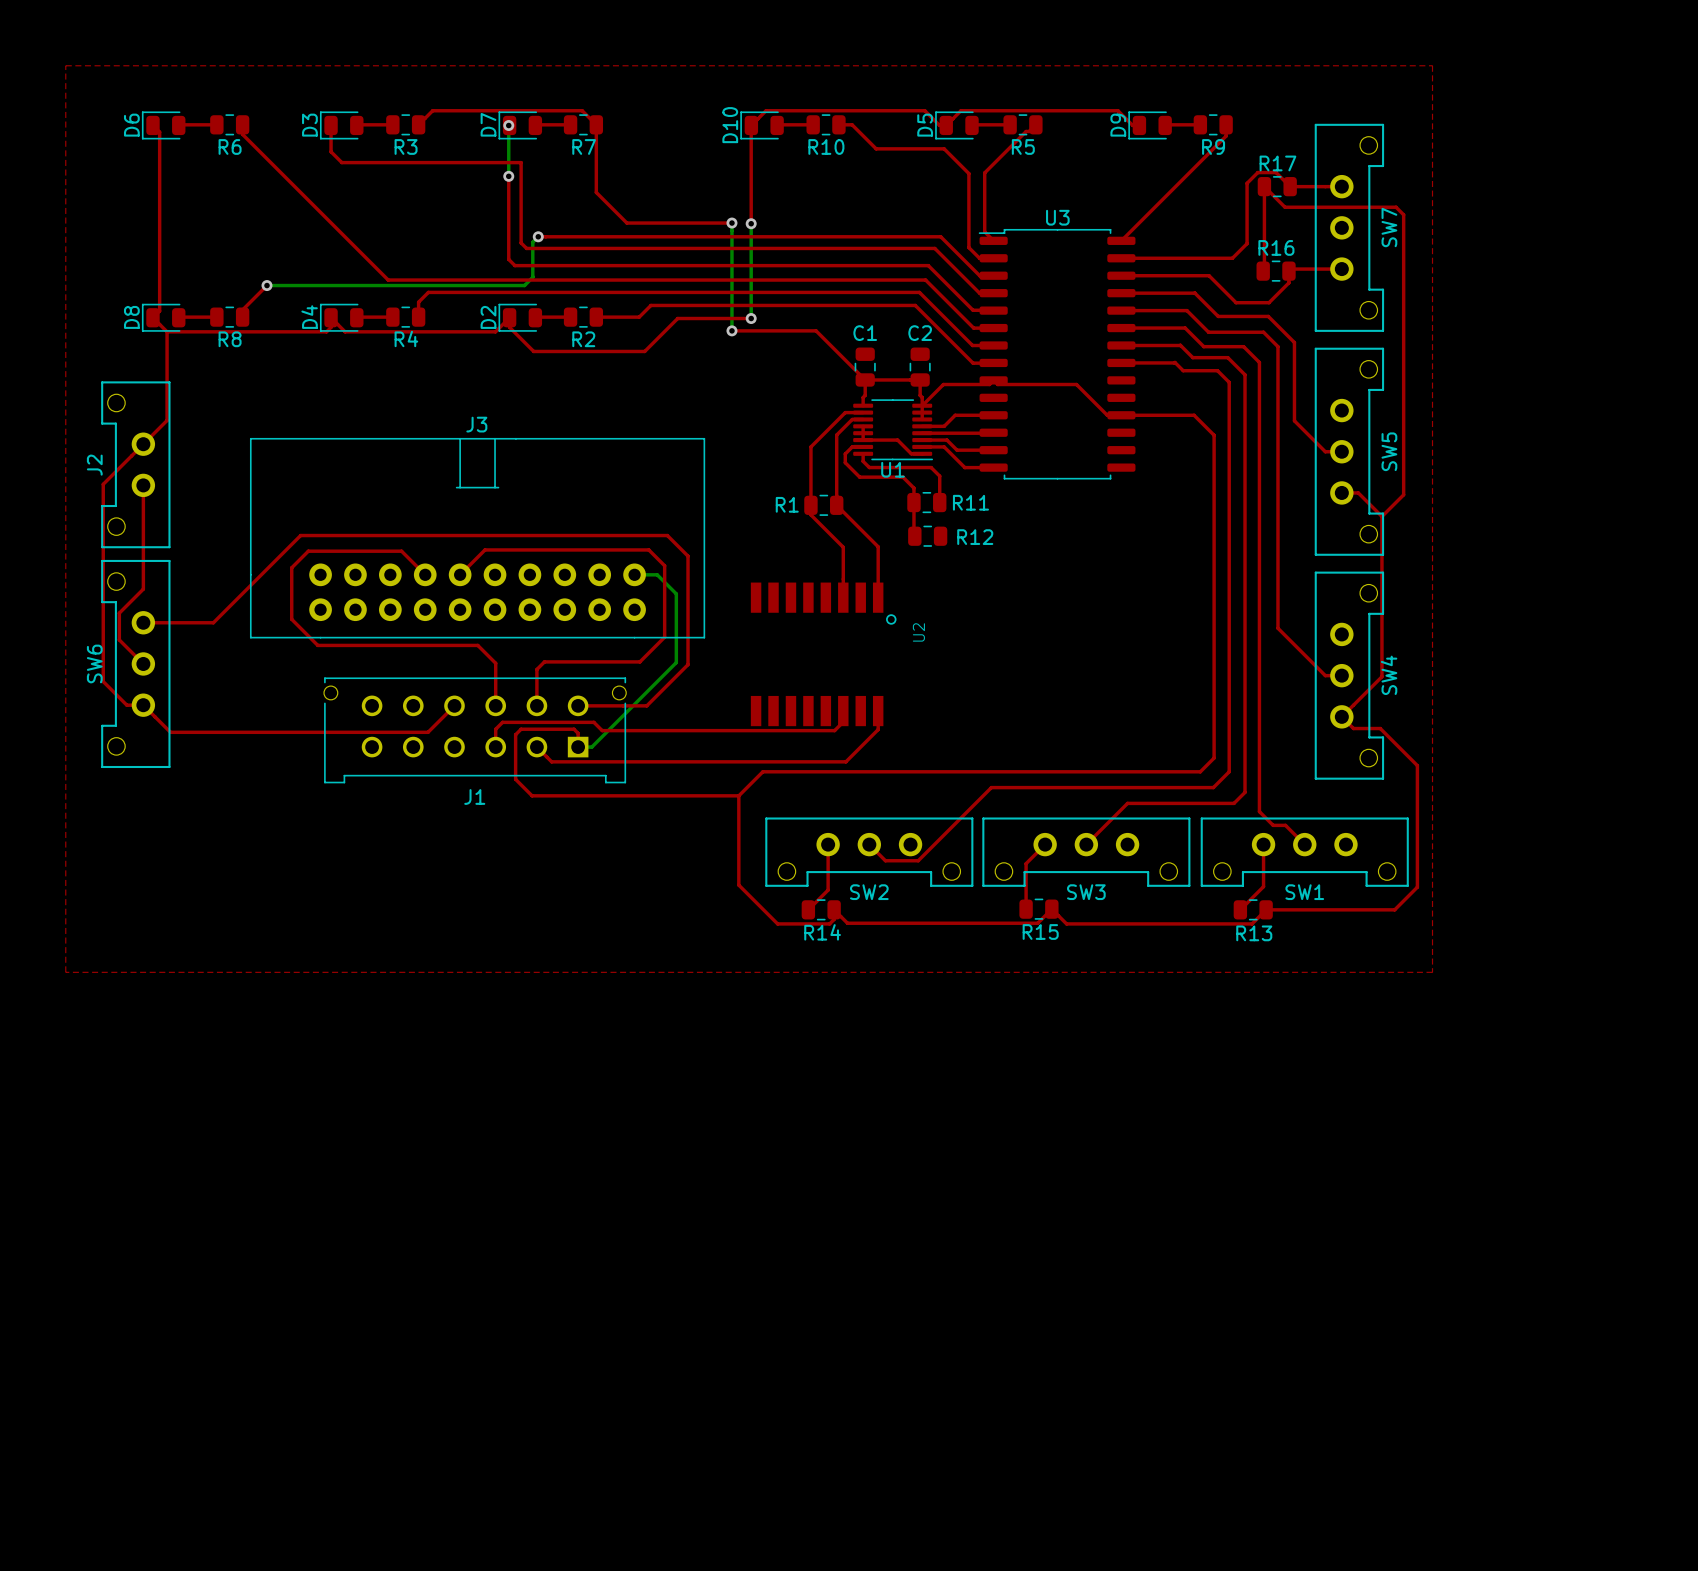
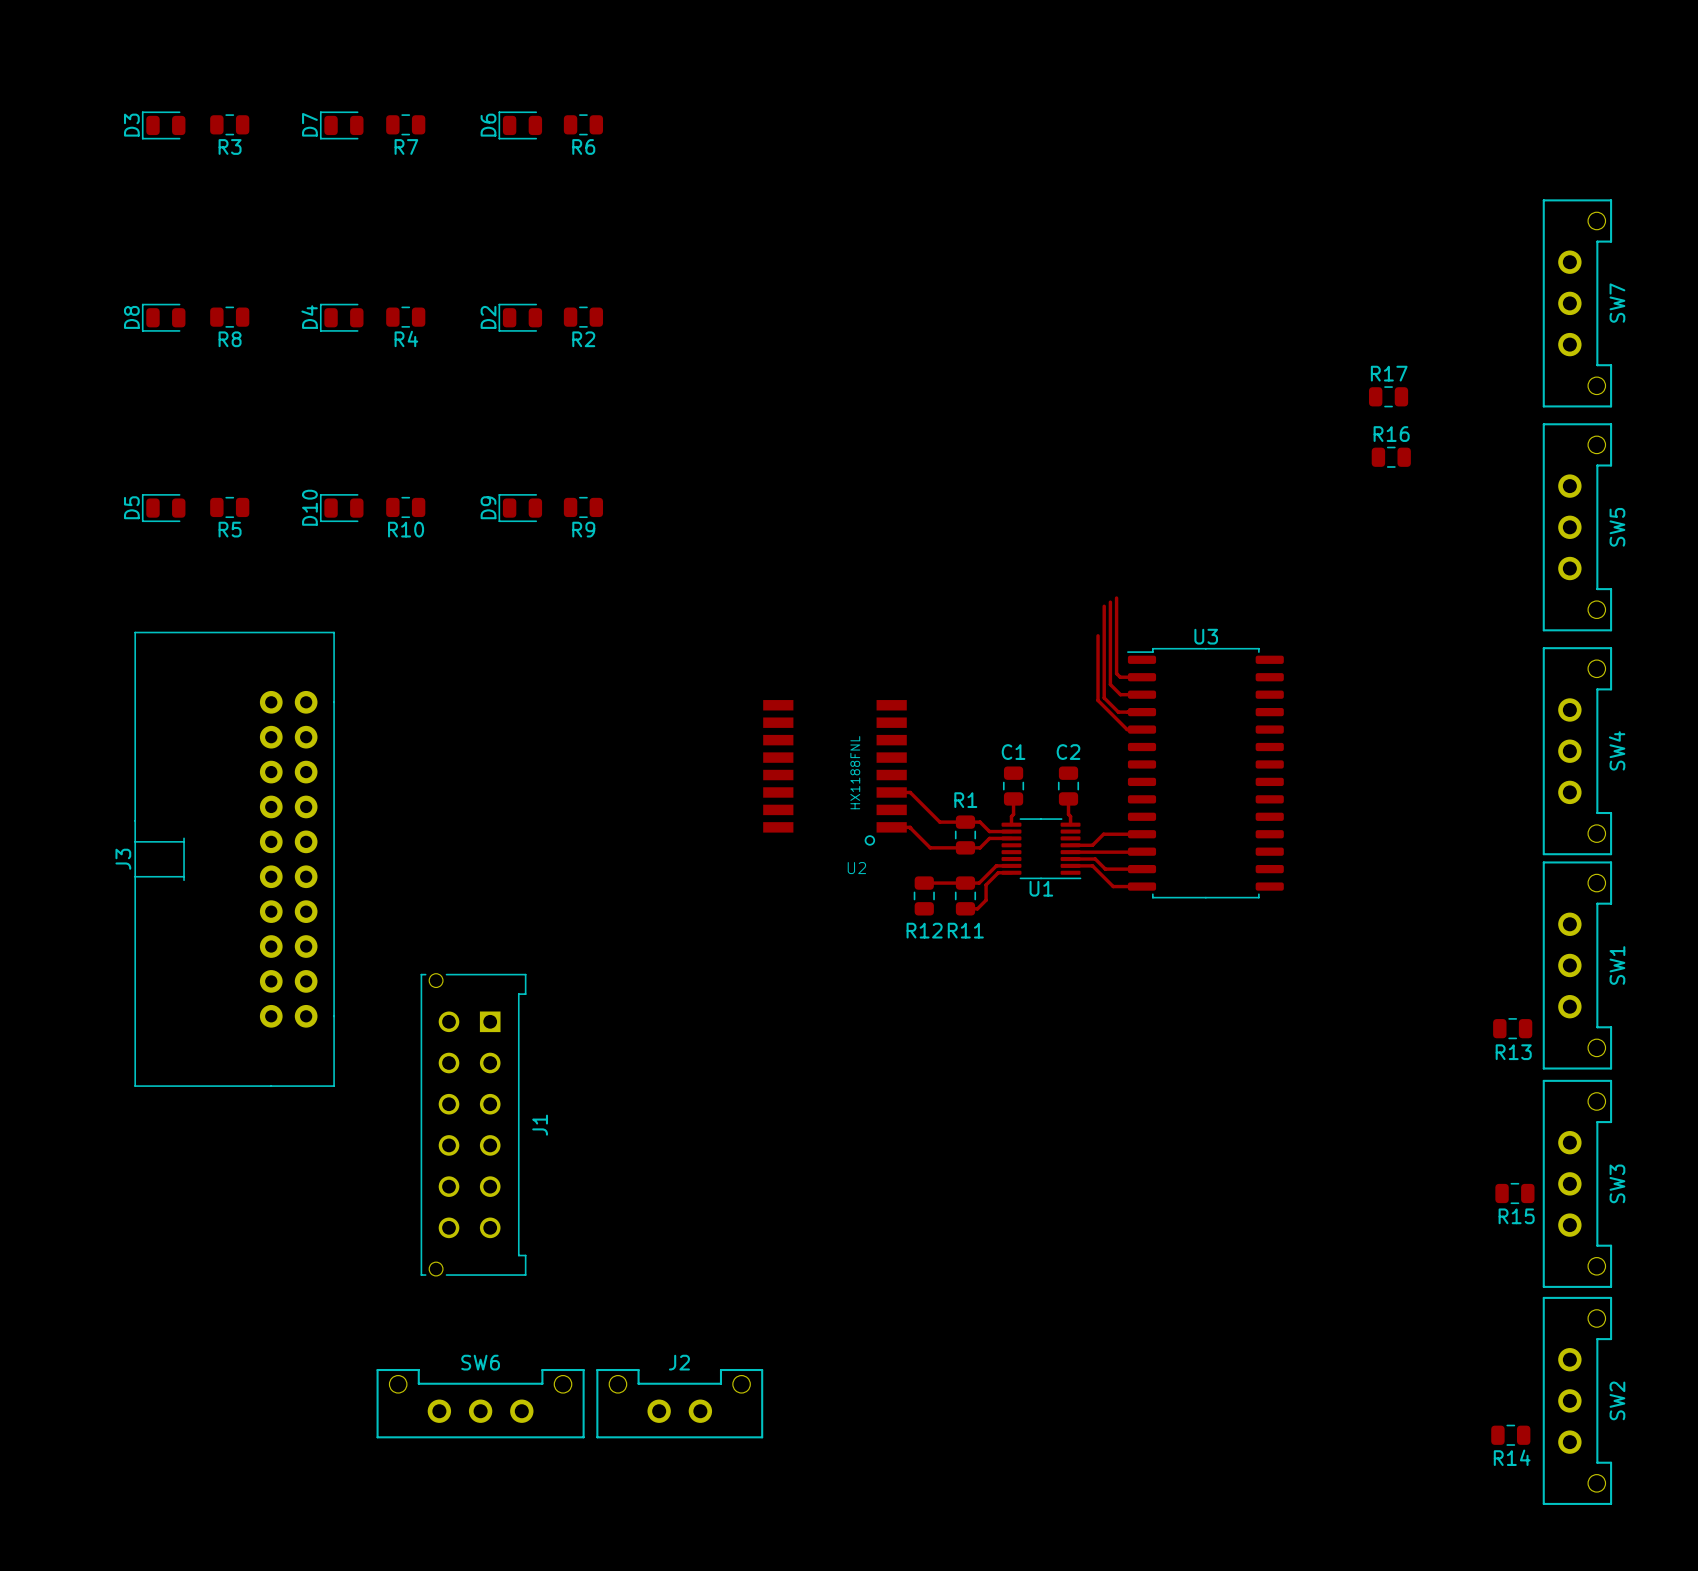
top zone outline: (65, 65) (65, 972) (1432, 972) (1432, 65) (65, 65) -> none
top track: (216, 124) (178, 125) -> none
top track: (242, 124) (242, 134) (388, 280) (925, 280) (973, 328) (982, 328) -> none
top track: (392, 124) (356, 125) -> none
top track: (418, 124) (432, 110) (582, 110) (596, 124) (596, 192) (626, 223) (731, 223) -> none
D7 name: D7 (488, 124) -> D6 (488, 125)
top track: (570, 124) (535, 125) -> none
top track: (813, 124) (777, 125) -> none
R10 position: (826, 124) -> (405, 507)
top track: (838, 124) (852, 124) (876, 148) (944, 148) (968, 173) (968, 247) (979, 258) (993, 258) -> none
top track: (1010, 124) (972, 125) -> none
R5 position: (1023, 124) -> (229, 507)
top track: (1035, 124) (1029, 131) (1026, 131) (984, 172) (984, 231) (993, 240) -> none
top track: (1200, 124) (1165, 125) -> none
R9 position: (1213, 124) -> (583, 507)
top track: (1226, 124) (1226, 136) (1121, 240) -> none
D6 name: D6 (131, 125) -> D3 (131, 125)
top track: (152, 125) (159, 132) (159, 311) (152, 317) (167, 331) -> none
D3 name: D3 (309, 125) -> D7 (309, 124)
top track: (331, 125) (331, 151) (341, 162) (521, 162) (521, 242) (526, 248) (934, 248) (979, 293) (993, 293) -> none
bottom track: (508, 125) (508, 176) -> none
via: (508, 125) -> none
D10 position: (762, 125) -> (341, 508)
D5 position: (956, 125) -> (163, 508)
top track: (1139, 125) (1132, 125) (1118, 110) (960, 110) (946, 125) (939, 125) (924, 110) (766, 110) (751, 125) (751, 223) -> none
D9 position: (1150, 125) -> (520, 508)
R6 name: R6 (230, 146) -> R3 (230, 146)
R3 name: R3 (406, 146) -> R7 (406, 146)
R7 name: R7 (584, 146) -> R6 (583, 146)
top track: (508, 176) (508, 259) (514, 265) (928, 265) (973, 310) (993, 310) -> none
via: (508, 176) -> none
R17 position: (1277, 186) -> (1388, 396)
top track: (1341, 186) (1290, 186) (1276, 172) (1257, 172) (1247, 183) (1247, 243) (1232, 258) (1121, 258) -> none
bottom track: (731, 223) (731, 330) -> none
via: (731, 223) -> none
bottom track: (751, 223) (751, 318) -> none
via: (751, 223) -> none
SW7 position: (1349, 227) -> (1577, 303)
top track: (538, 236) (940, 236) (979, 275) (993, 275) -> none
bottom track: (538, 236) (532, 242) (532, 277) (524, 285) (267, 285) -> none
via: (538, 236) -> none
top track: (1341, 269) (1291, 269) (1288, 271) (1288, 282) (1269, 302) (1236, 302) (1209, 275) (1121, 275) -> none
top track: (1263, 271) (1264, 186) (1285, 207) (1396, 207) (1403, 214) (1403, 494) (1381, 516) -> none
R16 position: (1276, 271) -> (1391, 457)
top track: (267, 285) (242, 309) (242, 317) -> none
via: (267, 285) -> none
top track: (1121, 293) (1194, 293) -> none
top track: (1194, 293) (1218, 316) (1268, 316) (1294, 342) (1294, 420) (1325, 451) (1341, 451) -> none
top track: (1121, 310) (1186, 310) (1208, 332) (1263, 332) (1277, 346) (1277, 628) (1325, 675) (1341, 675) -> none
top track: (216, 317) (178, 317) -> none
top track: (392, 317) (356, 317) -> none
top track: (418, 317) (418, 302) (428, 292) (919, 292) (972, 345) (993, 345) -> none
top track: (570, 317) (535, 317) -> none
top track: (596, 317) (639, 317) (650, 305) (915, 305) (973, 363) (993, 362) -> none
top track: (751, 318) (677, 318) (644, 351) (533, 351) (509, 327) (509, 317) (495, 331) (345, 331) (331, 317) (331, 327) (326, 331) (167, 331) -> none
via: (751, 318) -> none
top track: (1121, 328) (1185, 328) (1203, 346) (1243, 346) (1259, 362) (1259, 811) (1273, 825) (1285, 825) (1304, 844) -> none
top track: (731, 330) (816, 330) (865, 379) -> none
via: (731, 330) -> none
top track: (167, 331) (167, 420) (103, 484) (103, 681) (126, 705) (143, 705) (170, 732) (428, 732) (454, 705) -> none
top track: (1121, 345) (1180, 345) (1192, 357) (1227, 357) (1245, 374) (1245, 792) (1234, 803) (1127, 803) (1086, 844) -> none
U3 position: (1057, 354) -> (1205, 773)
top track: (1121, 362) (1174, 362) (1183, 370) (1217, 370) (1229, 382) (1229, 771) (1213, 787) (991, 787) (918, 860) (885, 860) (869, 844) -> none
C1 position: (865, 367) -> (1013, 786)
C2 position: (920, 367) -> (1068, 786)
top track: (865, 379) (863, 405) -> none
top track: (865, 379) (920, 379) (922, 419) -> none
top track: (922, 405) (943, 384) (989, 384) (993, 380) (997, 384) (1076, 384) (1107, 415) (1194, 415) (1214, 435) (1214, 758) (1200, 771) (762, 771) (738, 795) -> none
top track: (863, 412) (845, 412) (810, 446) (810, 514) (843, 547) (843, 597) -> none
top track: (993, 415) (955, 415) (944, 426) (922, 426) -> none
top track: (863, 419) (852, 419) (836, 435) (836, 505) (878, 546) (878, 597) -> none
top track: (863, 426) (863, 440) (897, 440) (911, 453) (924, 453) -> none
U1 position: (893, 429) -> (1041, 848)
top track: (993, 432) (922, 433) -> none
top track: (922, 440) (946, 440) (957, 450) (993, 450) -> none
top track: (863, 446) (852, 446) (845, 453) (845, 462) (859, 477) (902, 477) (913, 488) (914, 536) -> none
top track: (922, 446) (944, 446) (964, 467) (993, 467) -> none
SW5 position: (1349, 451) -> (1577, 527)
top track: (863, 453) (863, 461) (869, 467) (931, 467) (939, 476) (939, 502) -> none
J2 rotation: 0° (135, 464) -> 90° clockwise (679, 1403)
J2 position: (135, 464) -> (679, 1403)
top track: (143, 485) (143, 589) (119, 613) (119, 639) (143, 663) -> none
top track: (1341, 492) (1358, 492) (1381, 516) -> none
R11 rotation: 0° (926, 502) -> 90° clockwise (965, 895)
R11 position: (926, 502) -> (965, 895)
R1 rotation: 0° (823, 505) -> 90° clockwise (965, 834)
R1 position: (823, 505) -> (965, 834)
top track: (1381, 516) (1381, 676) (1341, 716) (1353, 728) (1380, 728) (1417, 765) (1417, 887) (1394, 909) (1266, 909) (1252, 923) (1066, 923) (1051, 909) (1037, 923) (847, 923) (834, 909) (834, 919) (829, 923) (777, 923) (738, 885) (738, 795) -> none
R12 rotation: 0° (927, 536) -> 90° clockwise (924, 895)
R12 position: (927, 536) -> (924, 895)
J3 rotation: 0° (477, 538) -> 90° counterclockwise (234, 859)
J3 position: (477, 538) -> (234, 859)
top track: (425, 574) (401, 551) (308, 551) (291, 567) (291, 619) (317, 645) (477, 645) (495, 663) (495, 705) -> none
top track: (460, 574) (484, 549) (648, 549) (664, 565) (664, 637) (639, 661) (544, 661) (536, 669) (536, 705) -> none
bottom track: (634, 574) (657, 574) (676, 593) (676, 662) (591, 747) (578, 747) -> none
top track: none -> (1116, 598) (1116, 673) (1120, 677) (1141, 677)
top track: none -> (1110, 602) (1110, 684) (1120, 694) (1141, 694)
top track: none -> (1104, 606) (1104, 697) (1118, 712) (1141, 712)
top track: (143, 622) (213, 622) (300, 535) (667, 535) (688, 556) (688, 664) (646, 705) (578, 705) -> none
top track: none -> (1098, 635) (1098, 700) (1127, 729) (1141, 729)
U2 rotation: 0° (823, 654) -> 90° clockwise (834, 772)
U2 position: (823, 654) -> (834, 772)
SW6 rotation: 0° (135, 663) -> 90° clockwise (480, 1403)
SW6 position: (135, 663) -> (480, 1403)
SW4 position: (1349, 675) -> (1577, 751)
top track: (843, 711) (843, 721) (834, 730) (602, 730) (593, 722) (502, 722) (495, 729) (495, 747) -> none
top track: (878, 711) (878, 729) (845, 761) (551, 761) (536, 747) -> none
J1 rotation: 0° (475, 730) -> 90° counterclockwise (473, 1124)
J1 position: (475, 730) -> (473, 1124)
top track: (578, 747) (578, 733) (574, 729) (521, 729) (515, 734) (515, 779) (532, 795) (738, 795) -> none
U2 value: none -> HX1188FNL (855, 772)
top track: none -> (891, 792) (910, 792) (939, 822) (980, 822) (989, 831) (1011, 831)
top track: none -> (1013, 798) (1011, 824)
top track: none -> (1068, 798) (1070, 824)
top track: none -> (891, 827) (910, 827) (930, 847) (980, 847) (989, 838) (1011, 838)
top track: none -> (1141, 834) (1103, 834) (1092, 845) (1070, 845)
top track: (828, 844) (828, 890) (808, 909) -> none
top track: (1045, 844) (1026, 863) (1026, 909) -> none
top track: (1263, 844) (1263, 886) (1240, 909) -> none
top track: none -> (1141, 851) (1070, 852)
SW2 rotation: 0° (869, 852) -> 90° counterclockwise (1577, 1400)
SW2 position: (869, 852) -> (1577, 1400)
SW3 rotation: 0° (1086, 852) -> 90° counterclockwise (1577, 1183)
SW3 position: (1086, 852) -> (1577, 1183)
SW1 rotation: 0° (1304, 852) -> 90° counterclockwise (1577, 965)
SW1 position: (1304, 852) -> (1577, 965)
top track: none -> (1070, 859) (1095, 859) (1105, 869) (1141, 869)
top track: none -> (1011, 865) (996, 865) (979, 883) (924, 883)
top track: none -> (1070, 865) (1092, 865) (1113, 886) (1141, 886)
top track: none -> (1011, 872) (998, 872) (986, 884) (986, 900) (977, 908) (965, 908)
R14 position: (821, 909) -> (1510, 1435)
R15 position: (1038, 909) -> (1514, 1193)
R13 position: (1253, 909) -> (1512, 1028)

